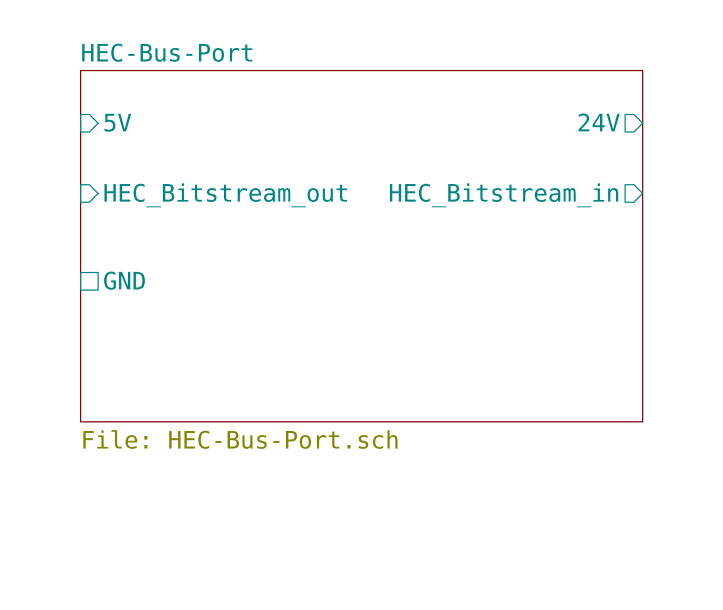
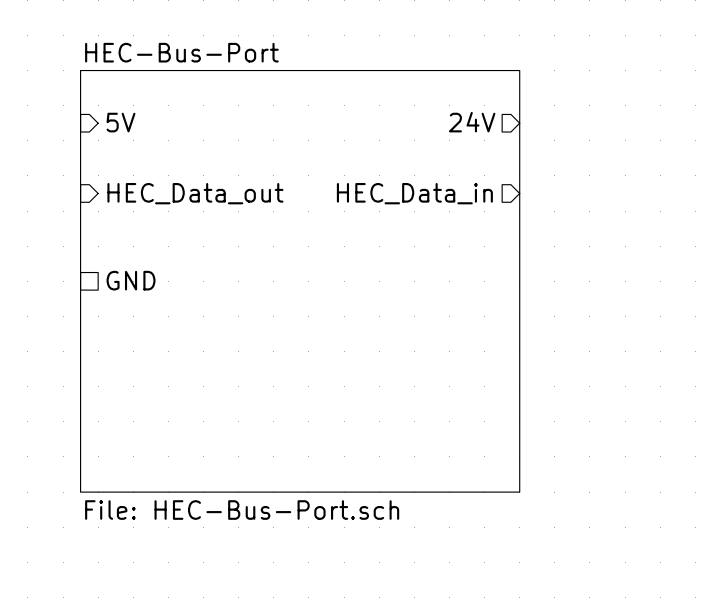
sheet pin position: 24V (599, 122) -> 24V (472, 122)
sheet pin: HEC_Bitstream_out (225, 195) -> HEC_Data_out (195, 193)
sheet pin: HEC_Bitstream_in (504, 195) -> HEC_Data_in (414, 193)
sheet HEC-Bus-Port: File: HEC-Bus-Port.sch (361, 246) -> none
sheet HEC-Bus-Port: none -> File: HEC-Bus-Port.sch (300, 281)

